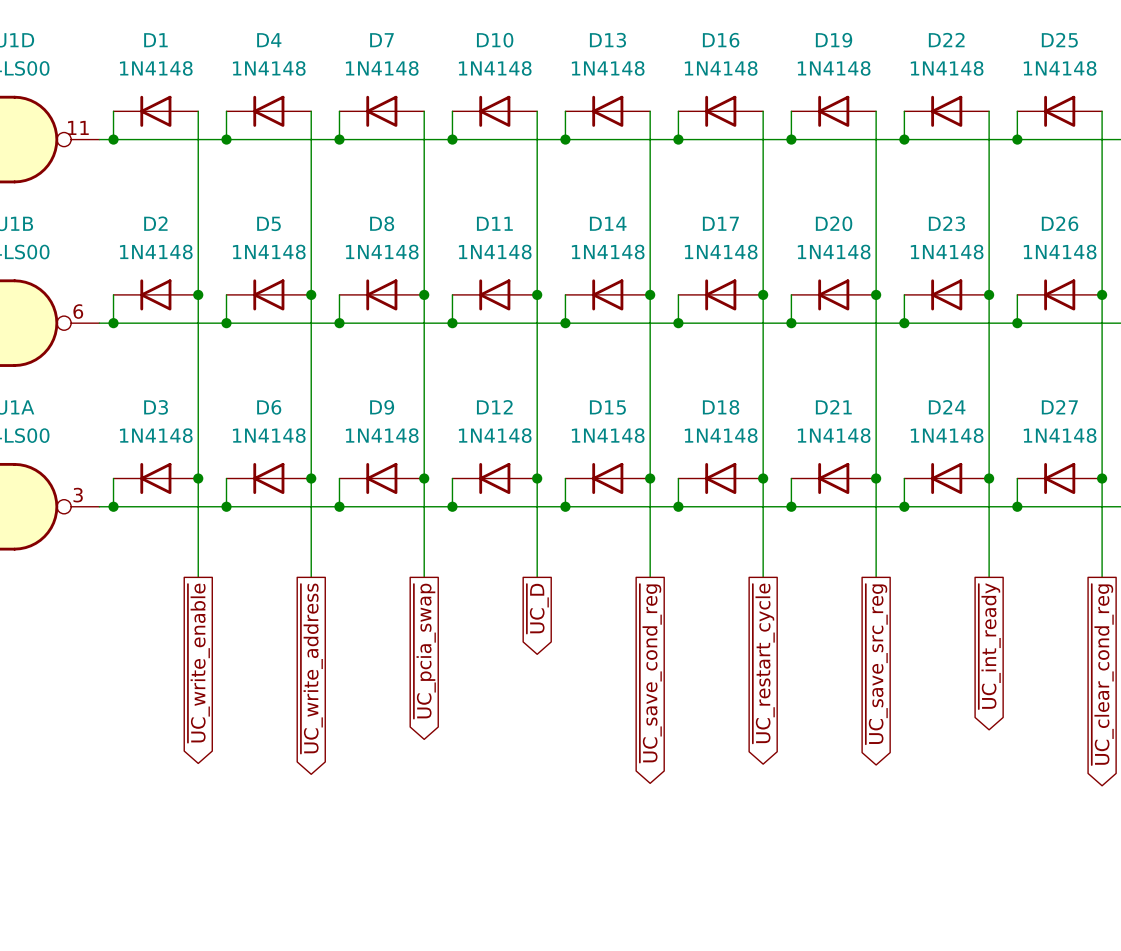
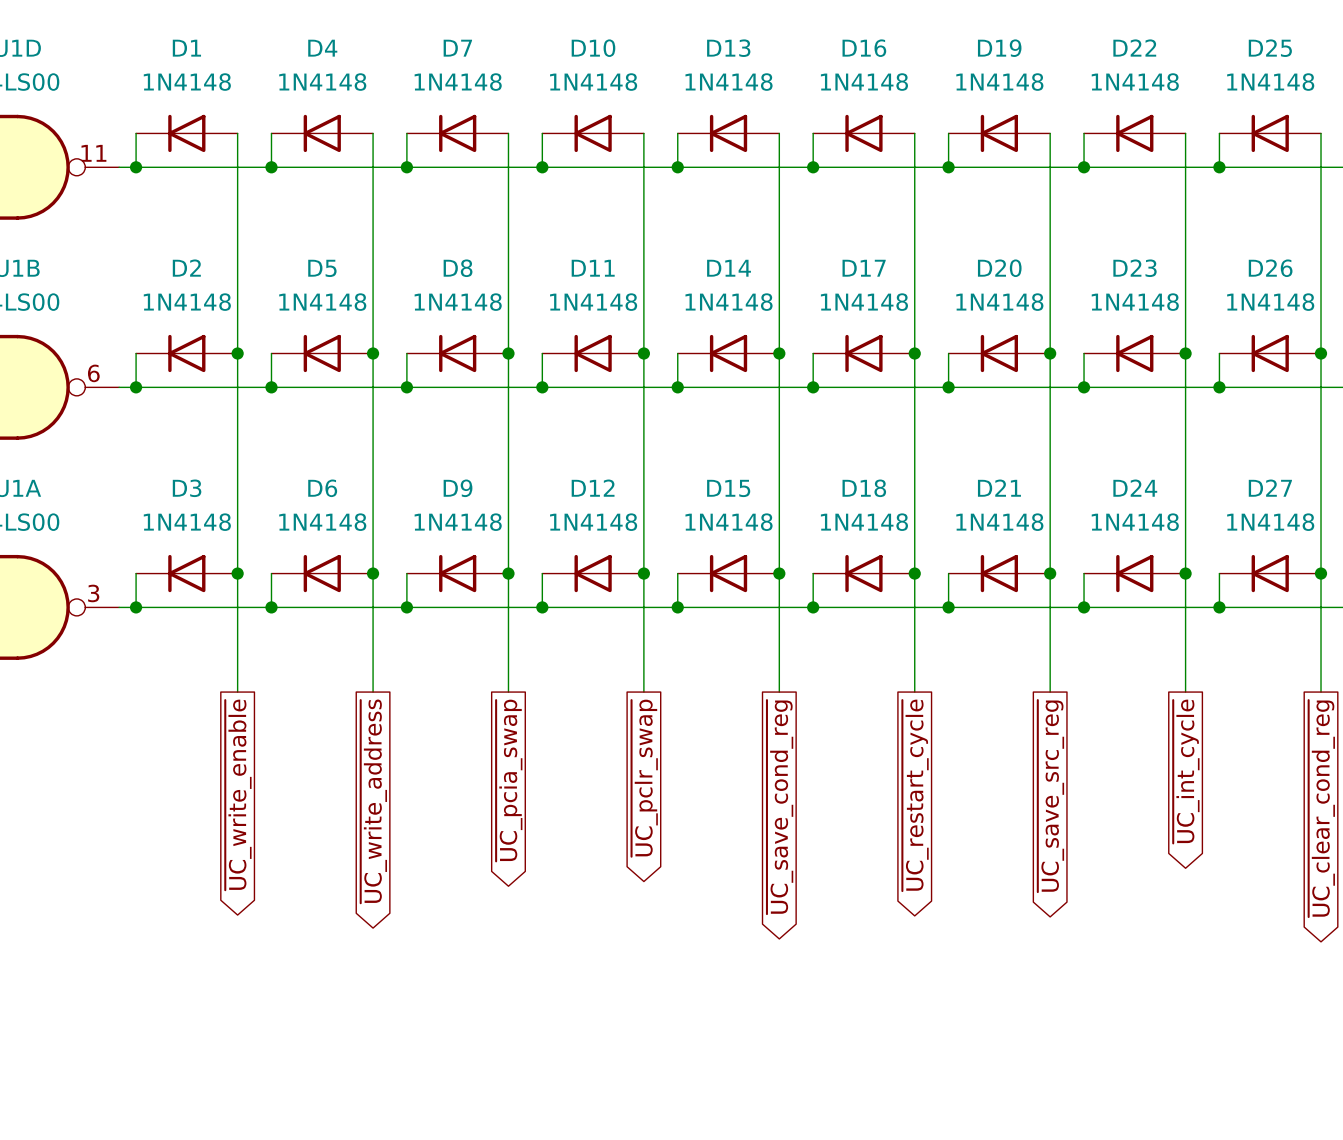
global label: ~{UC_D} (537, 608) -> ~{UC_pclr_swap} (644, 778)
global label: ~{UC_int_ready} (989, 646) -> ~{UC_int_cycle} (1186, 771)

